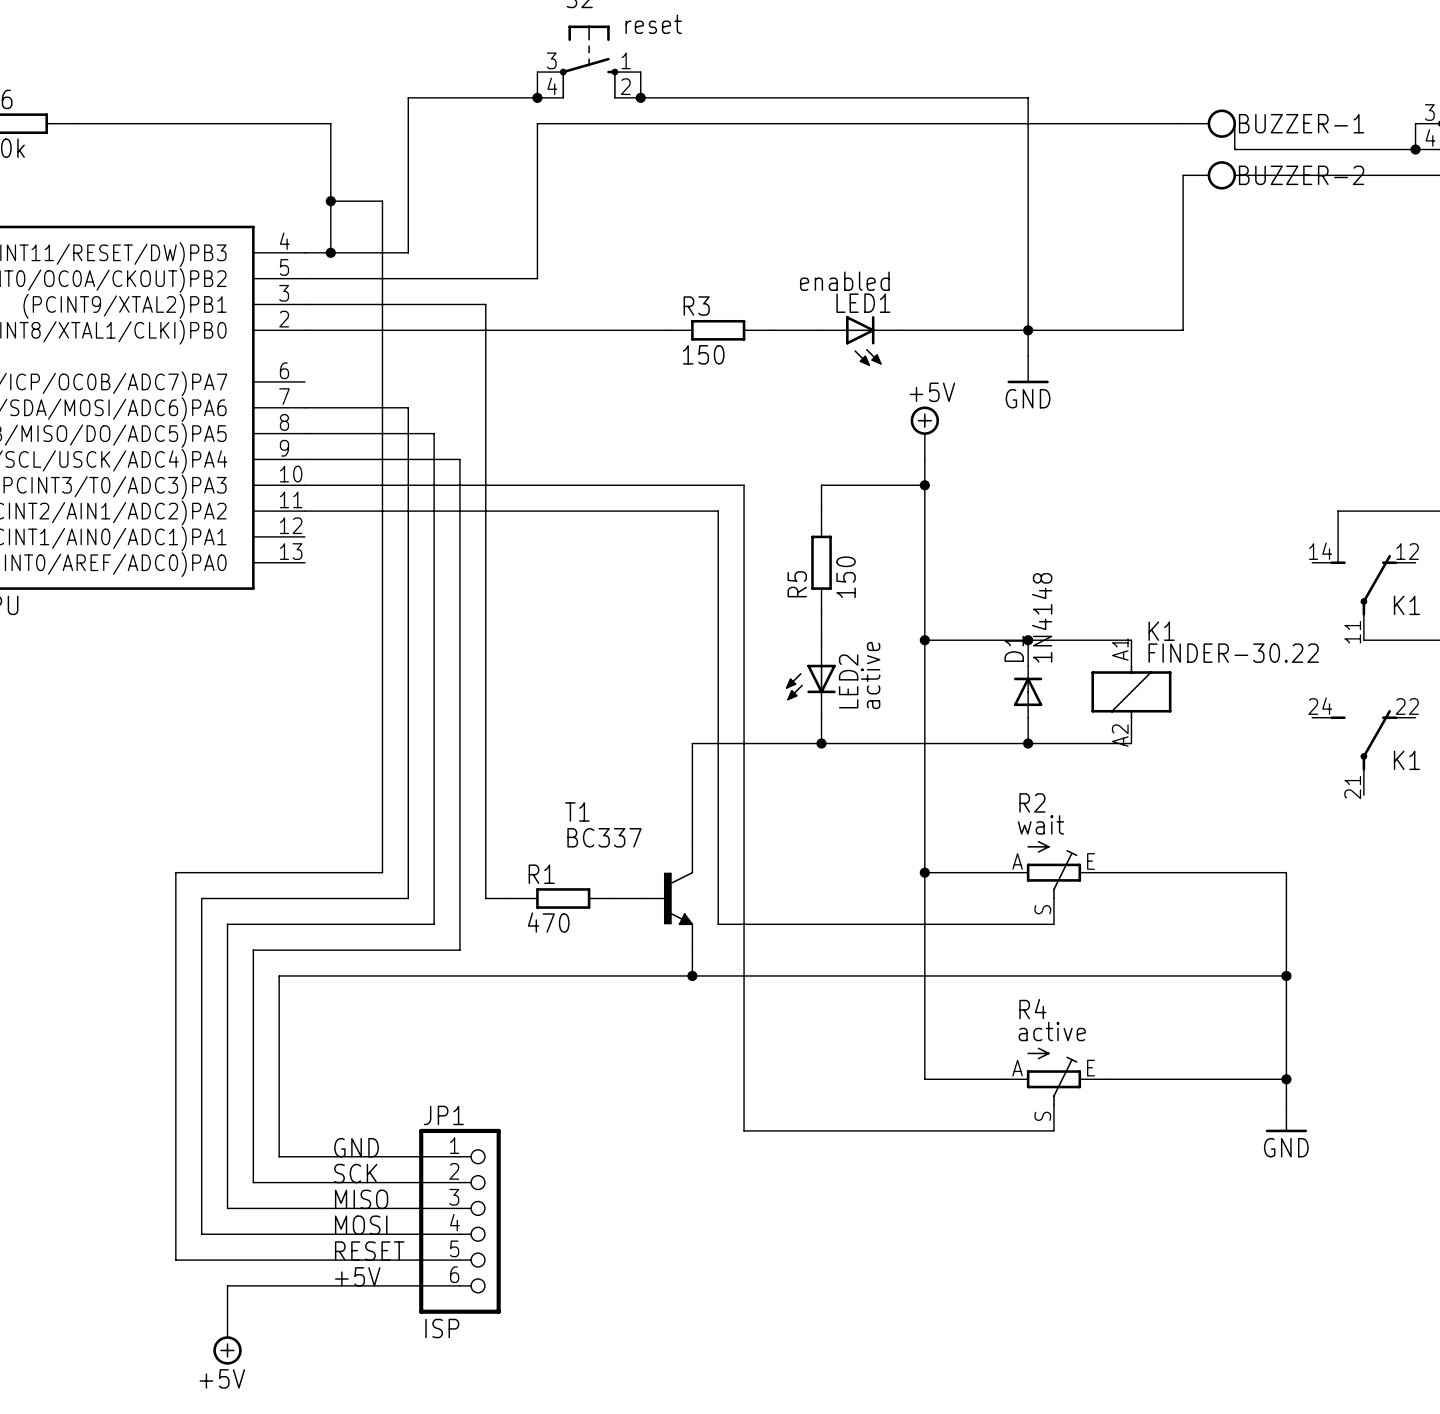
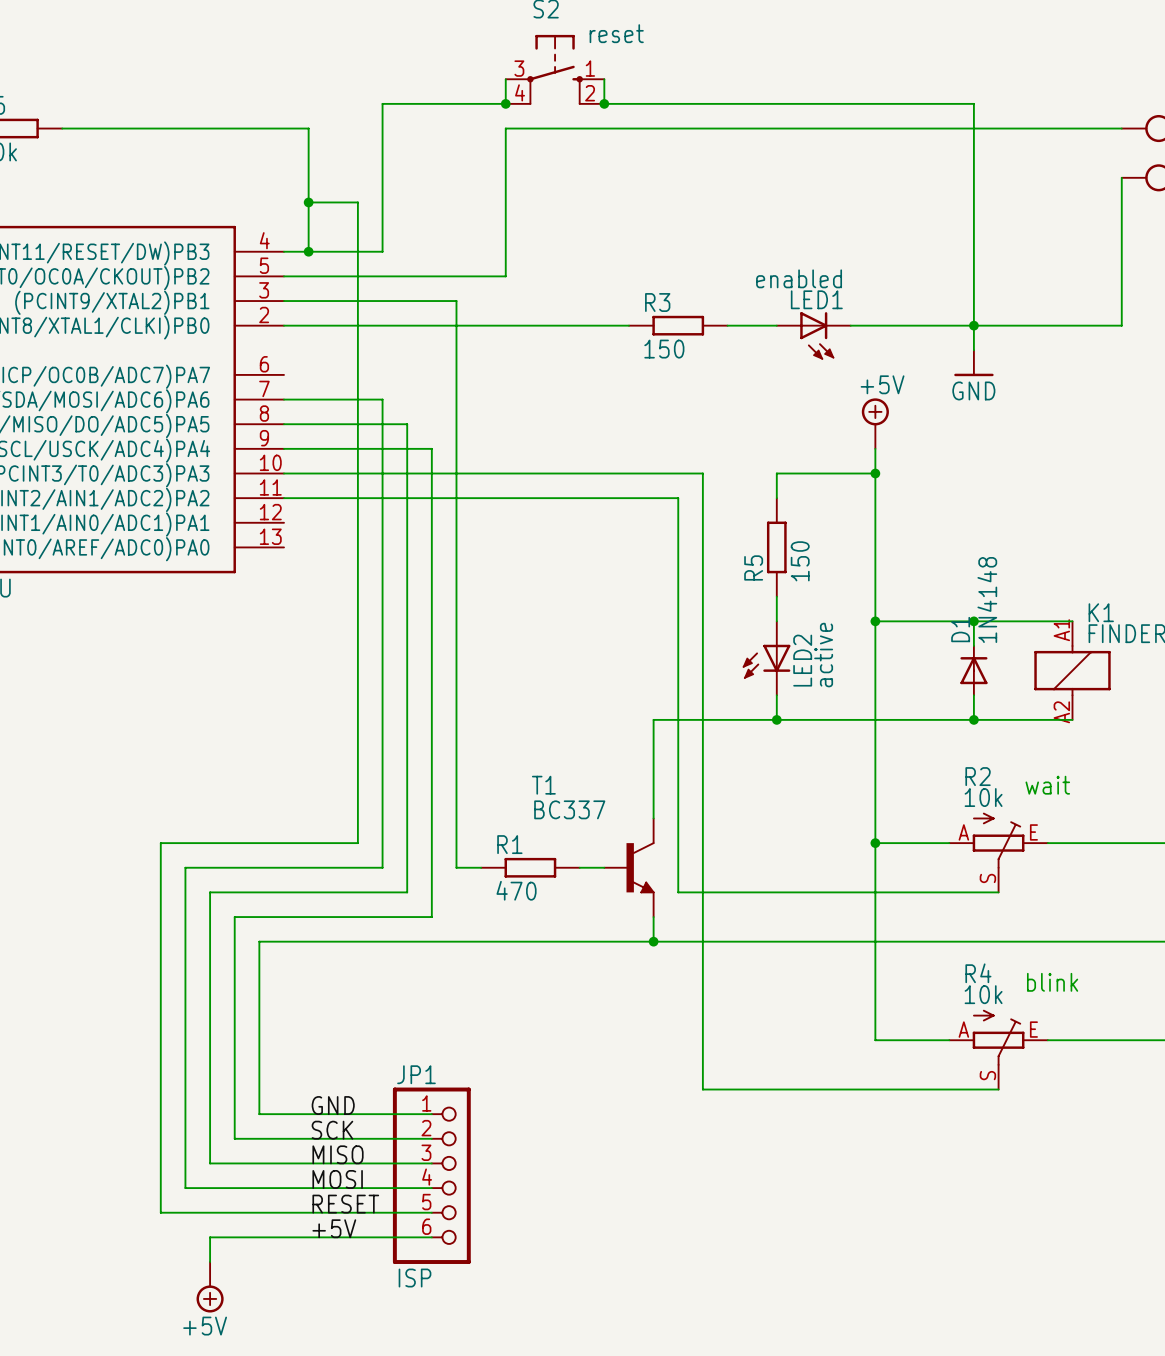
text: none -> wait (1047, 785)
R2 value: wait (1040, 824) -> 10k (983, 797)
text: none -> blink (1052, 982)
R4 value: active (1052, 1031) -> 10k (983, 994)

